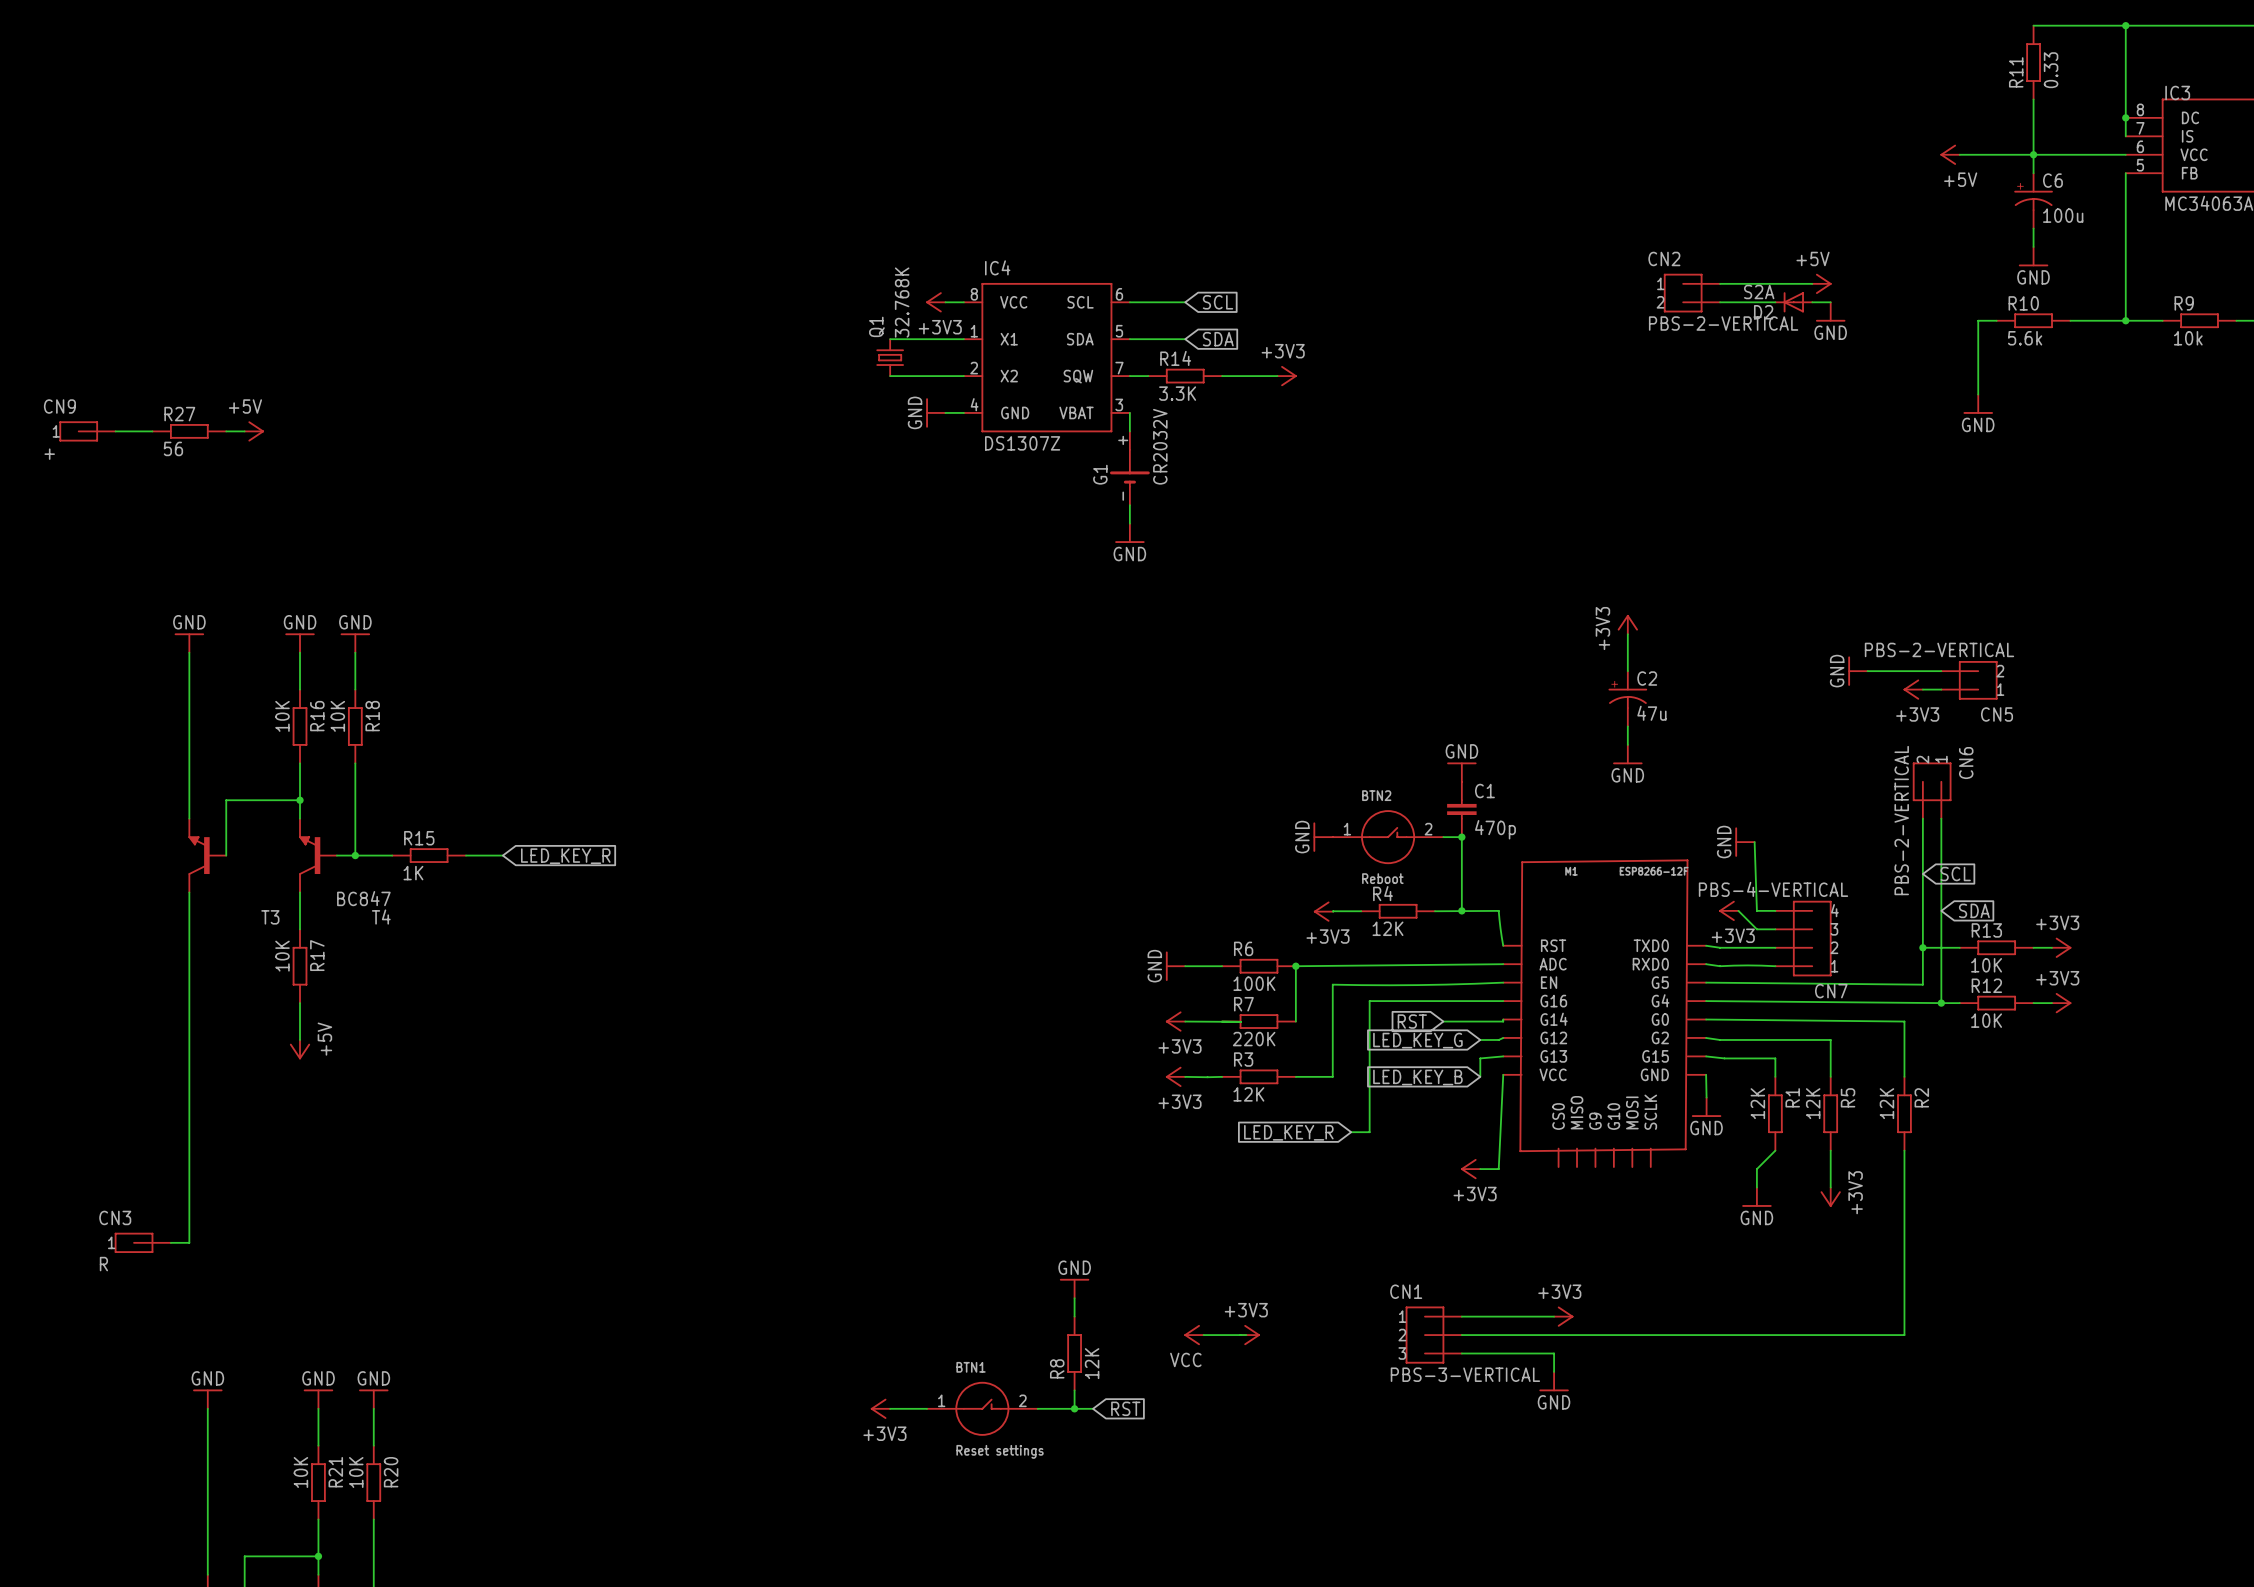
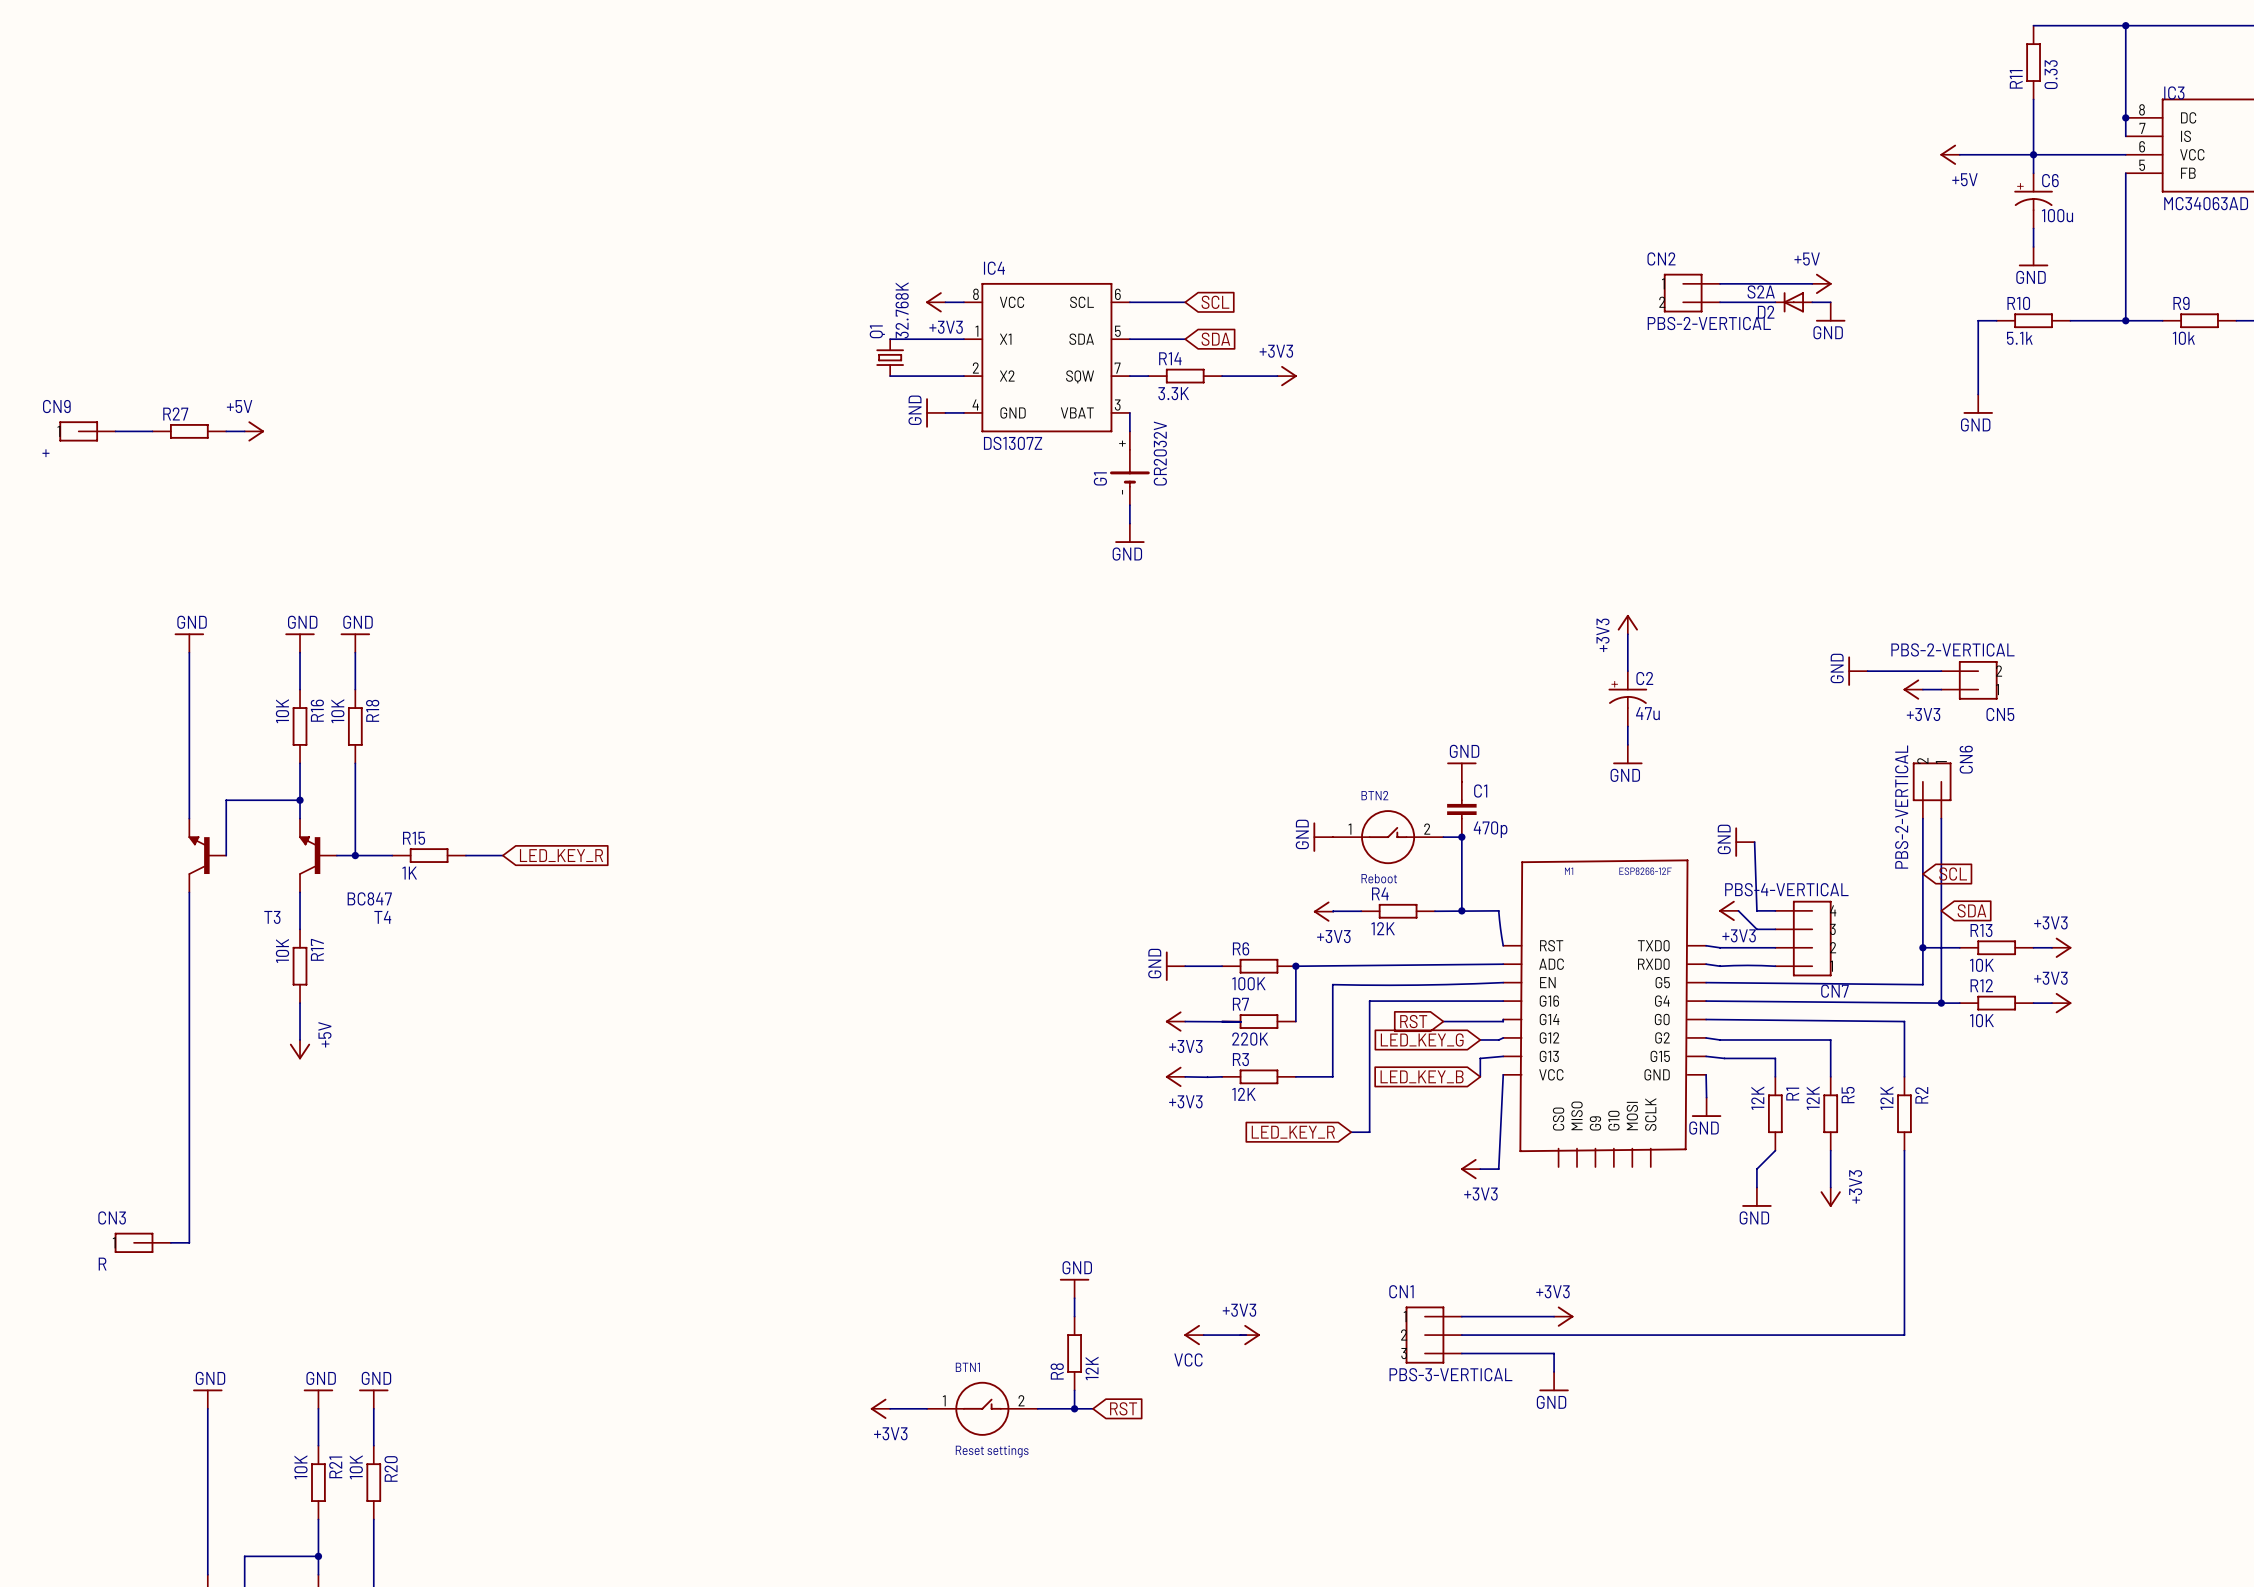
R10 value: 5.6k (2025, 338) -> 5.1k (2019, 338)
R27 value: 56 (173, 448) -> none

